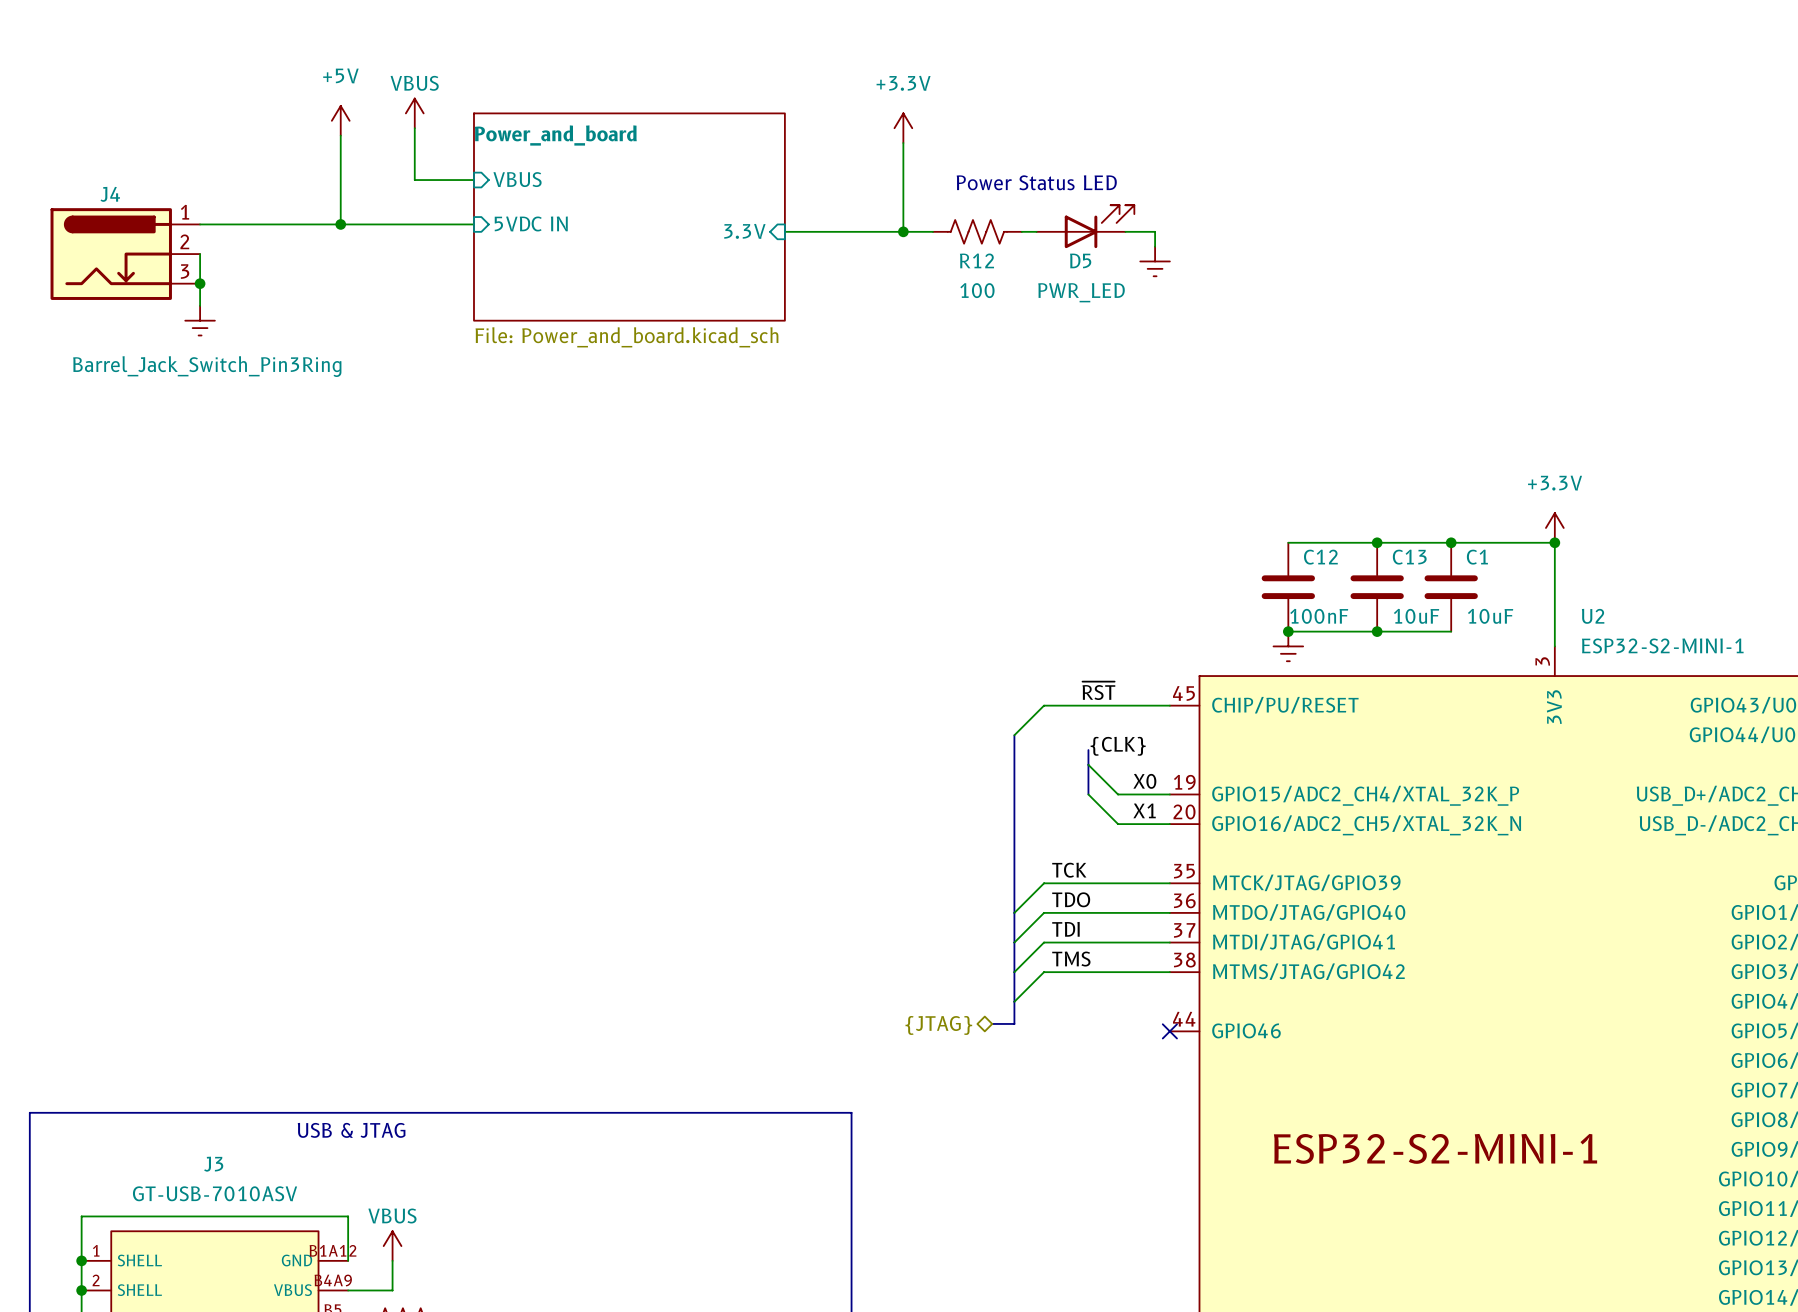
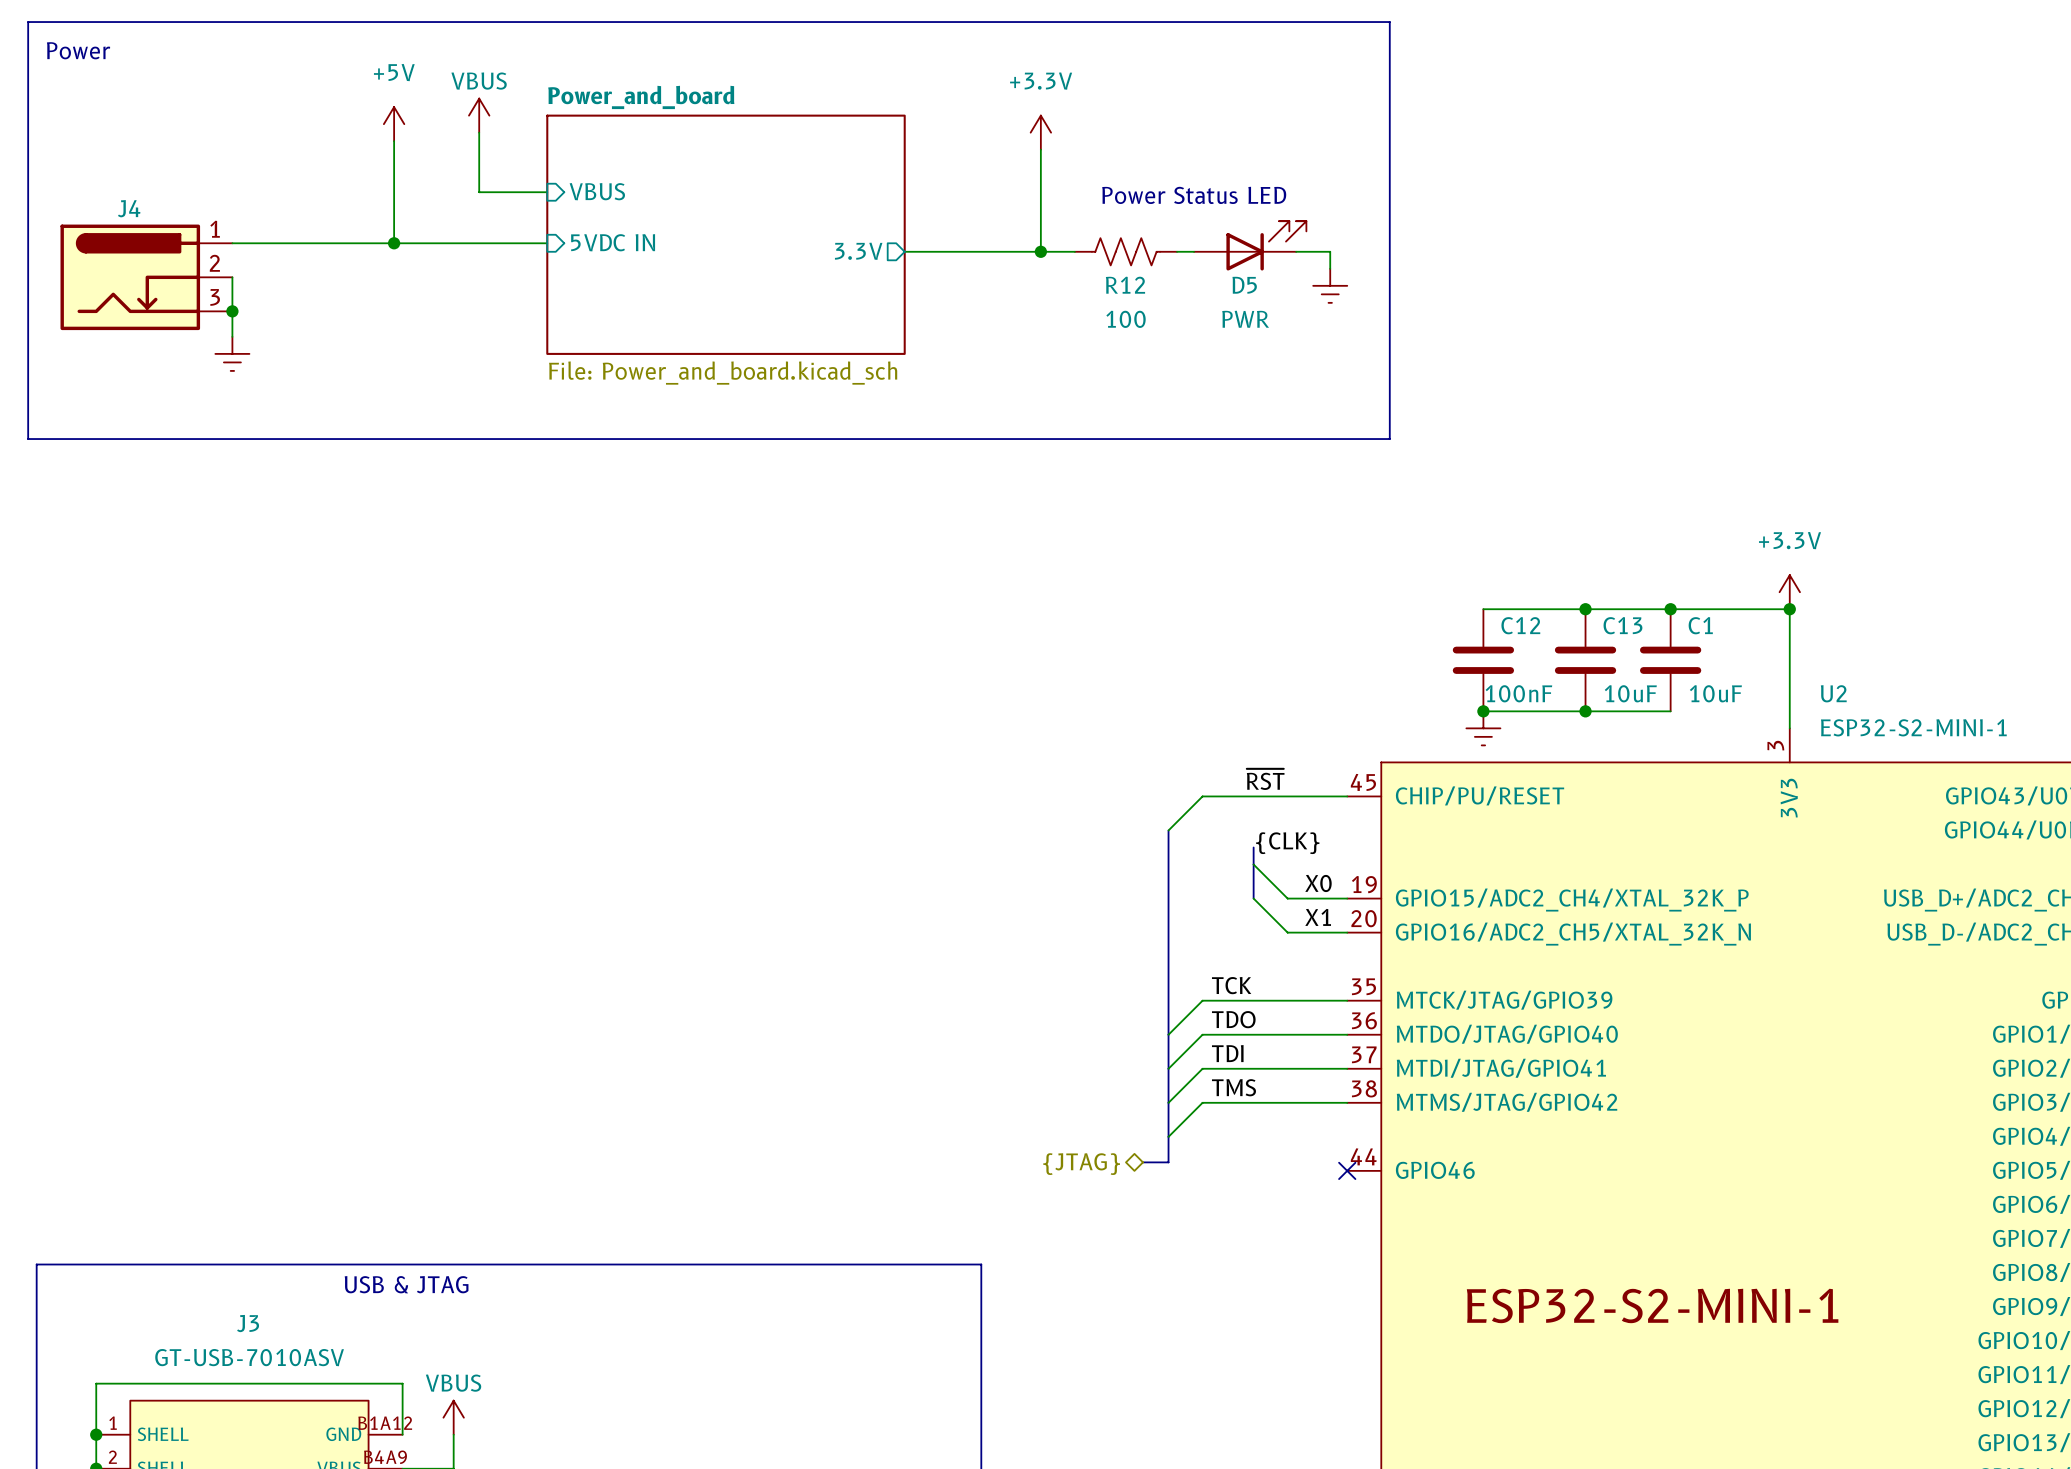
line: none -> (28, 22) (1389, 22) (1389, 439) (28, 439) (28, 22)
text: none -> Power (78, 50)
sheet Power_and_board name position: Power_and_board (555, 135) -> Power_and_board (641, 97)
sheet pin shape: input (744, 231) -> output (858, 251)
D5 value: PWR_LED (1081, 292) -> PWR (1245, 319)
J4 value: Barrel_Jack_Switch_Pin3Ring (207, 366) -> none

